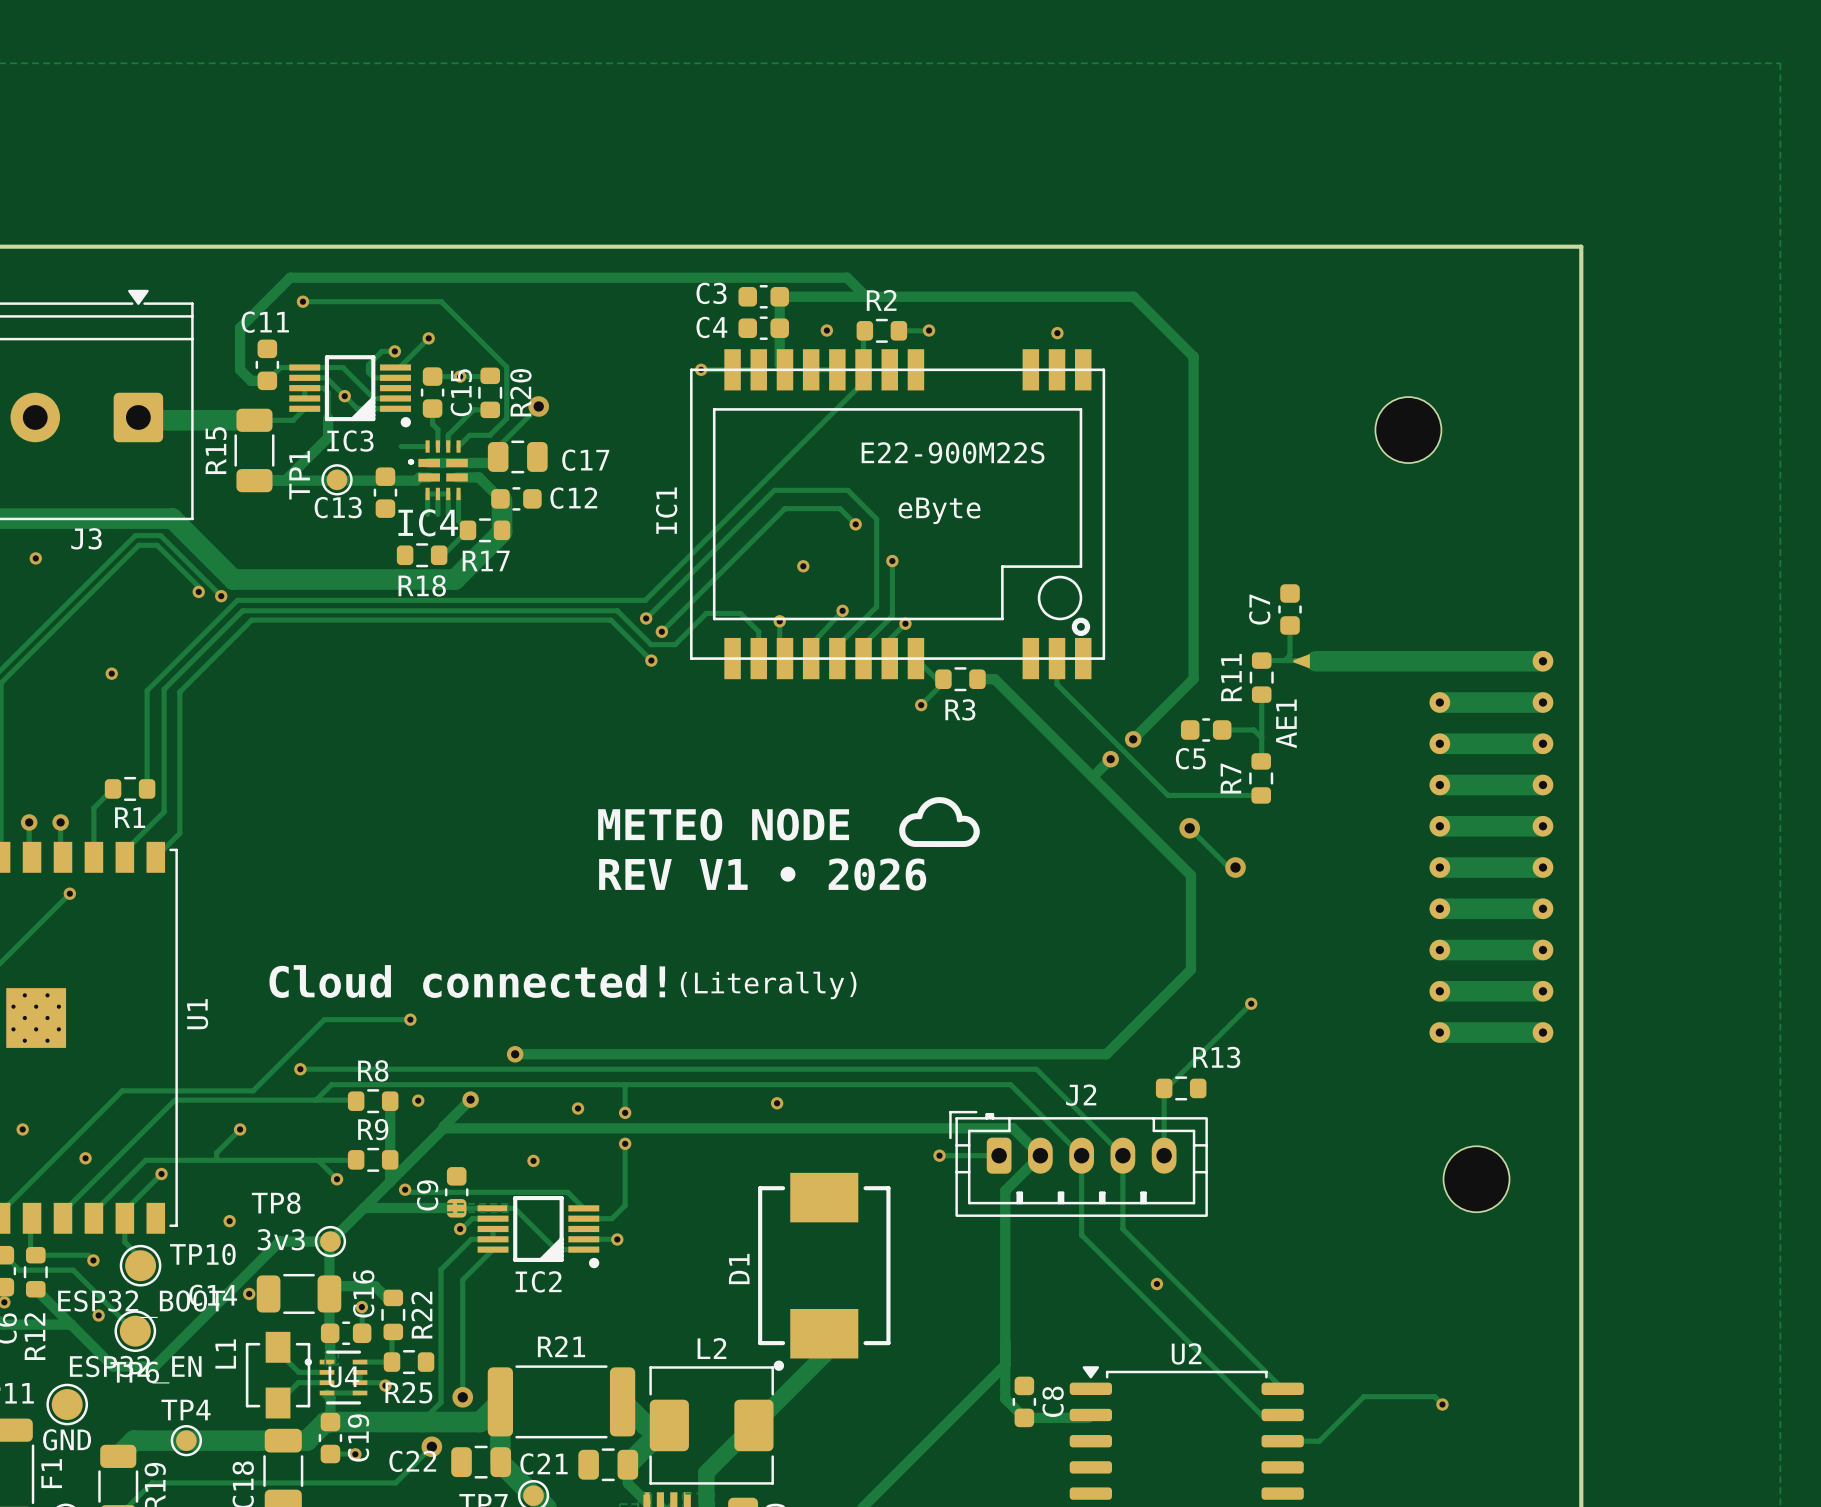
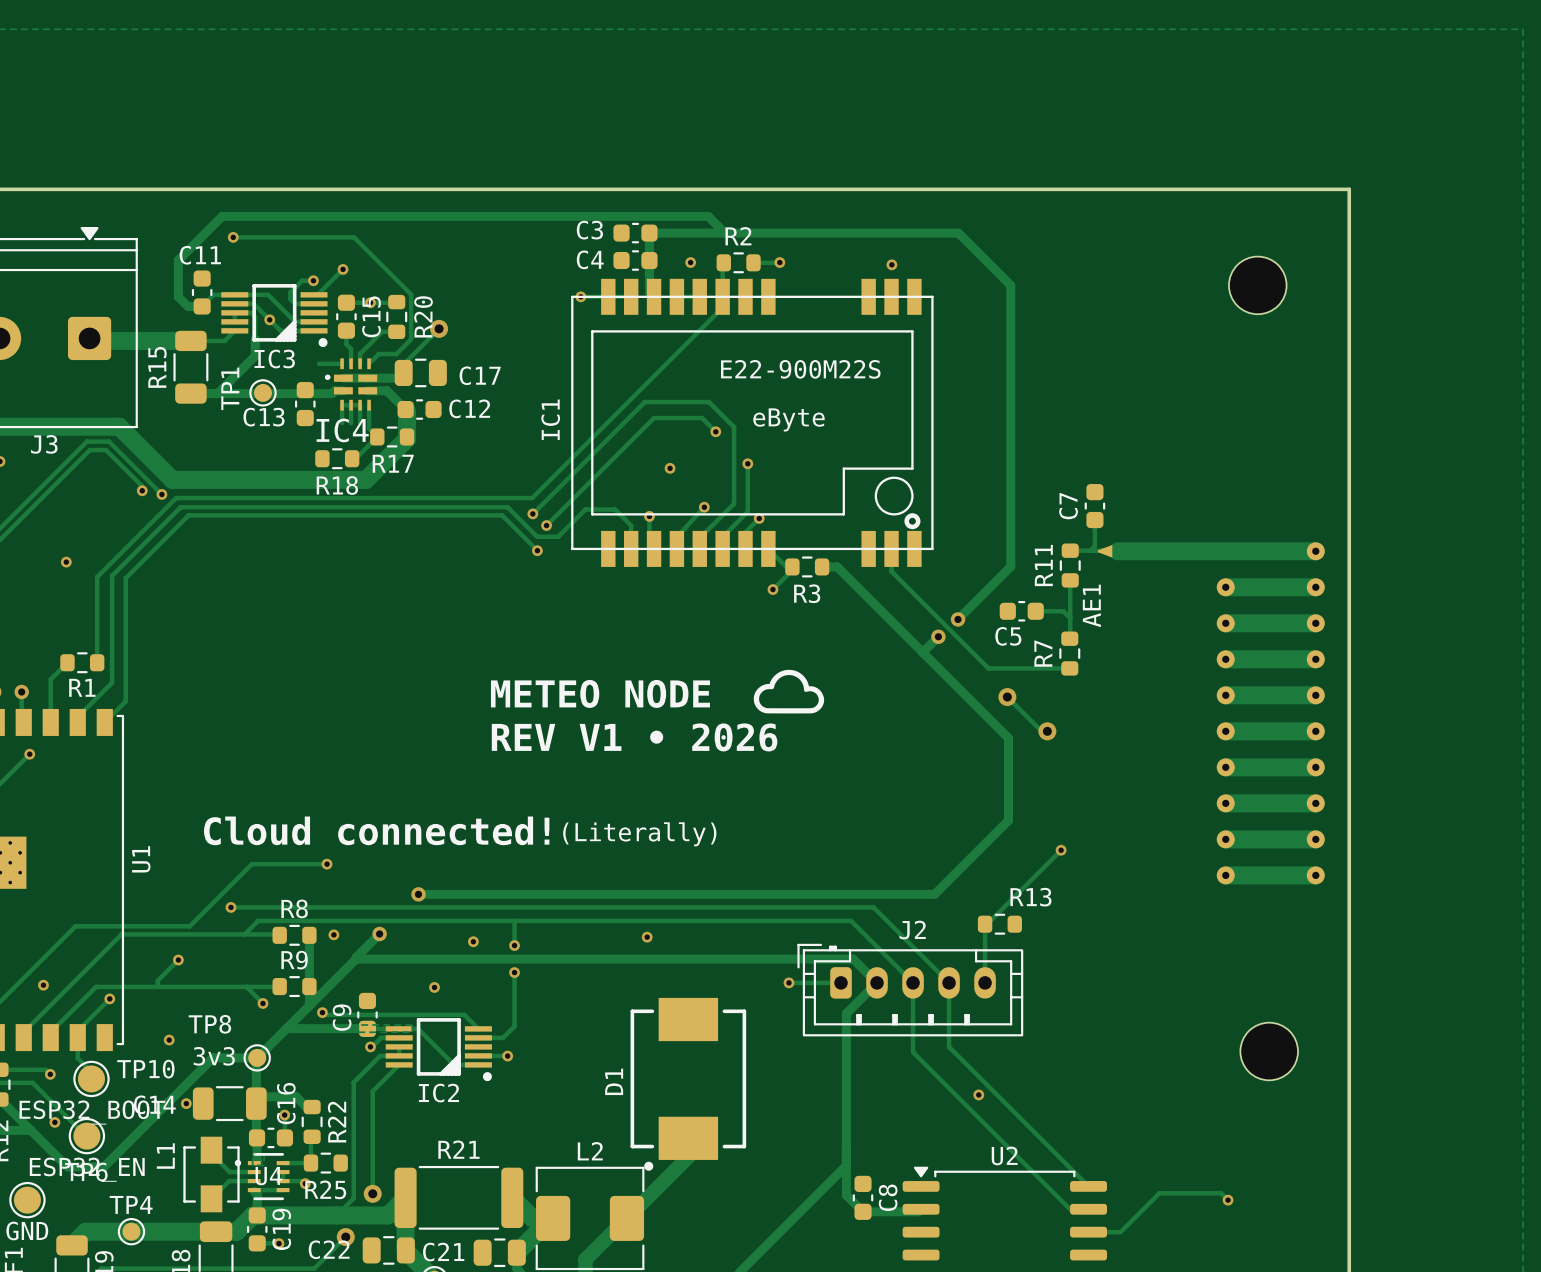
part position: (1408, 430) -> (1257, 285)
part position: (1476, 1179) -> (1269, 1051)

